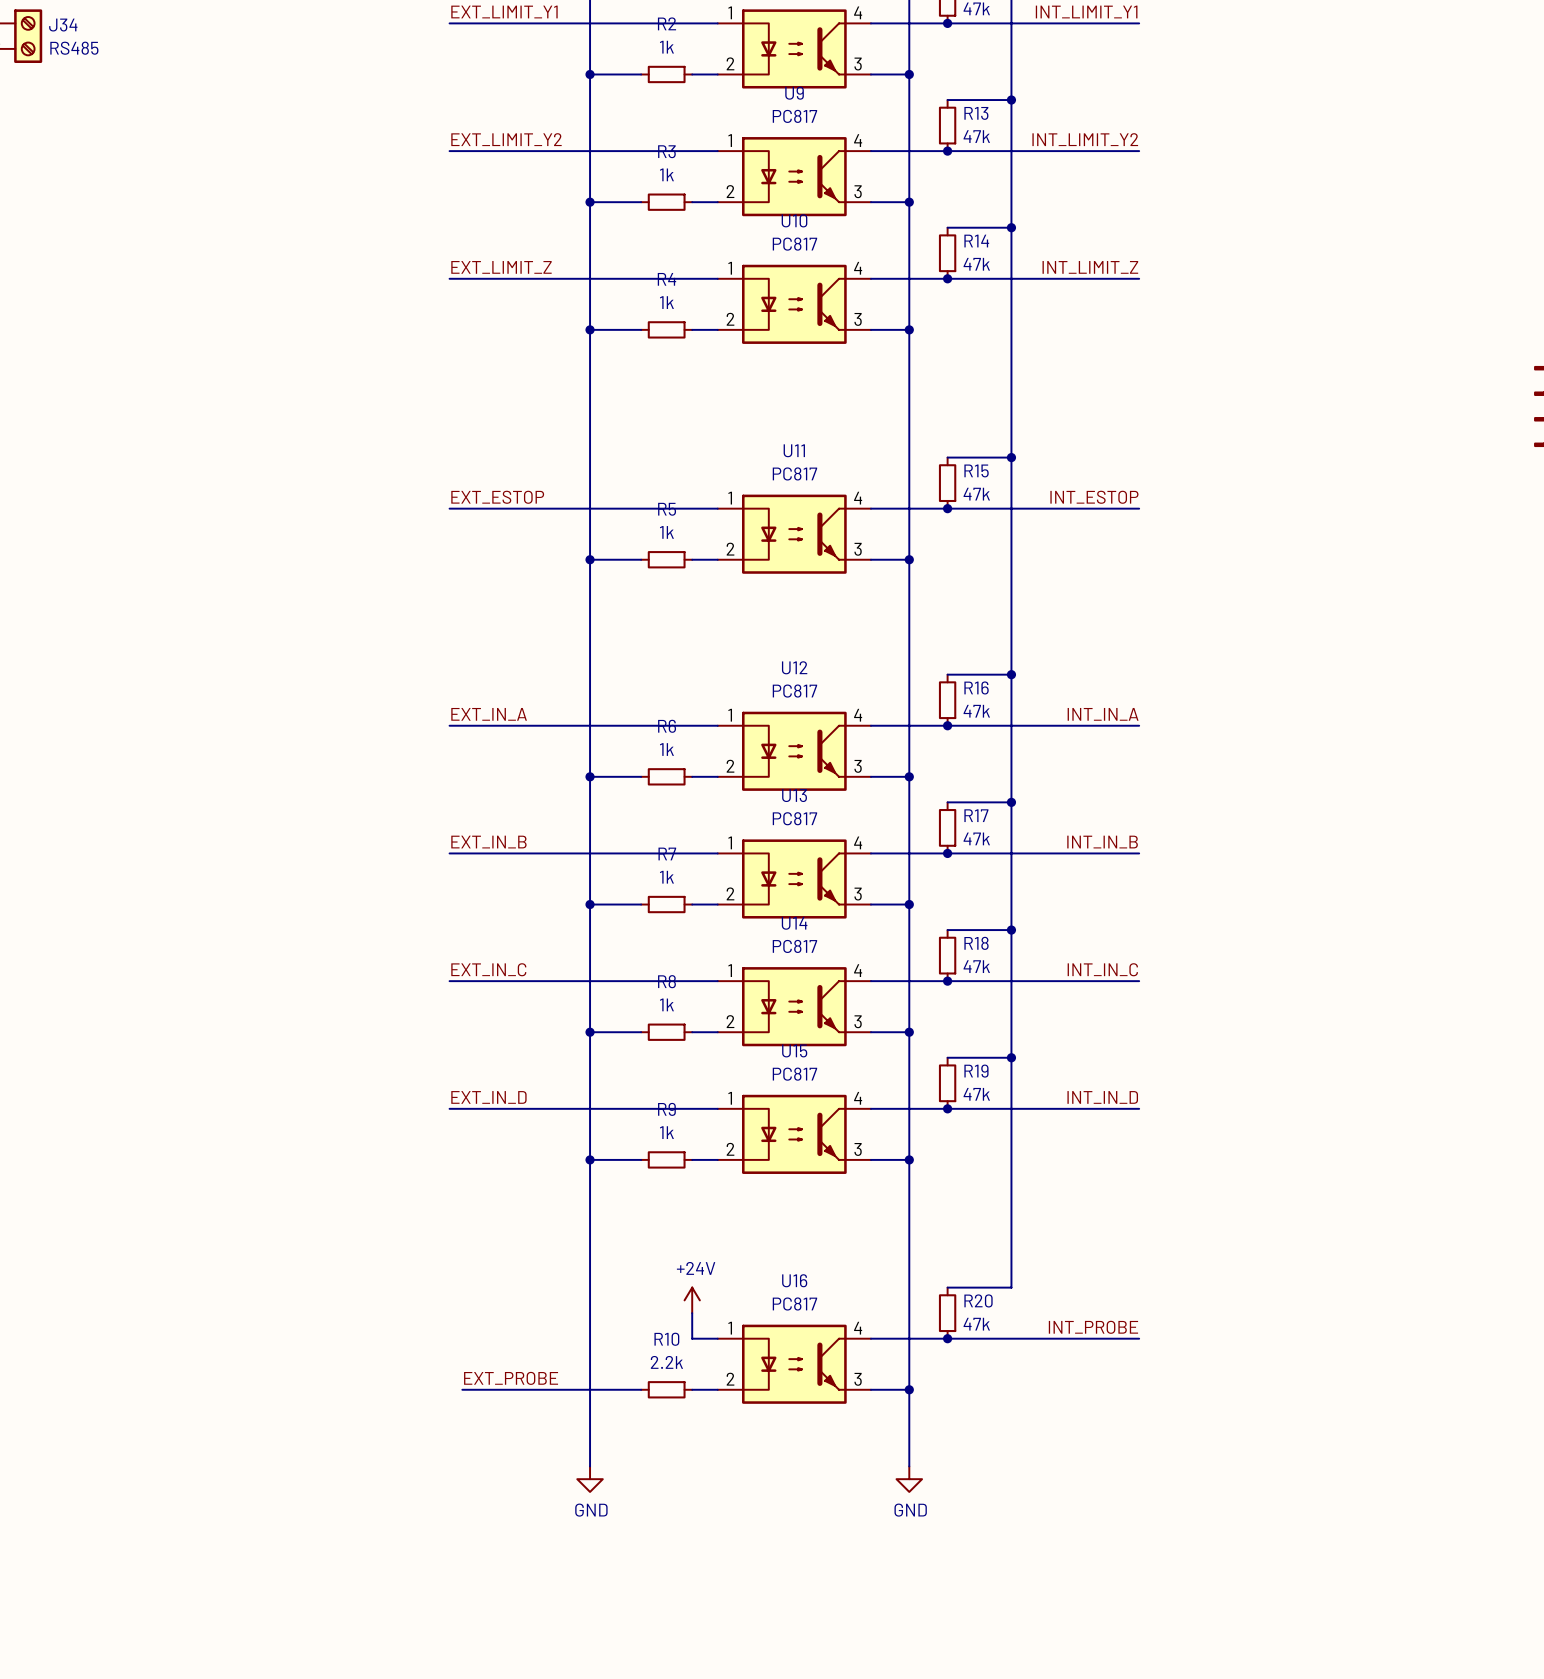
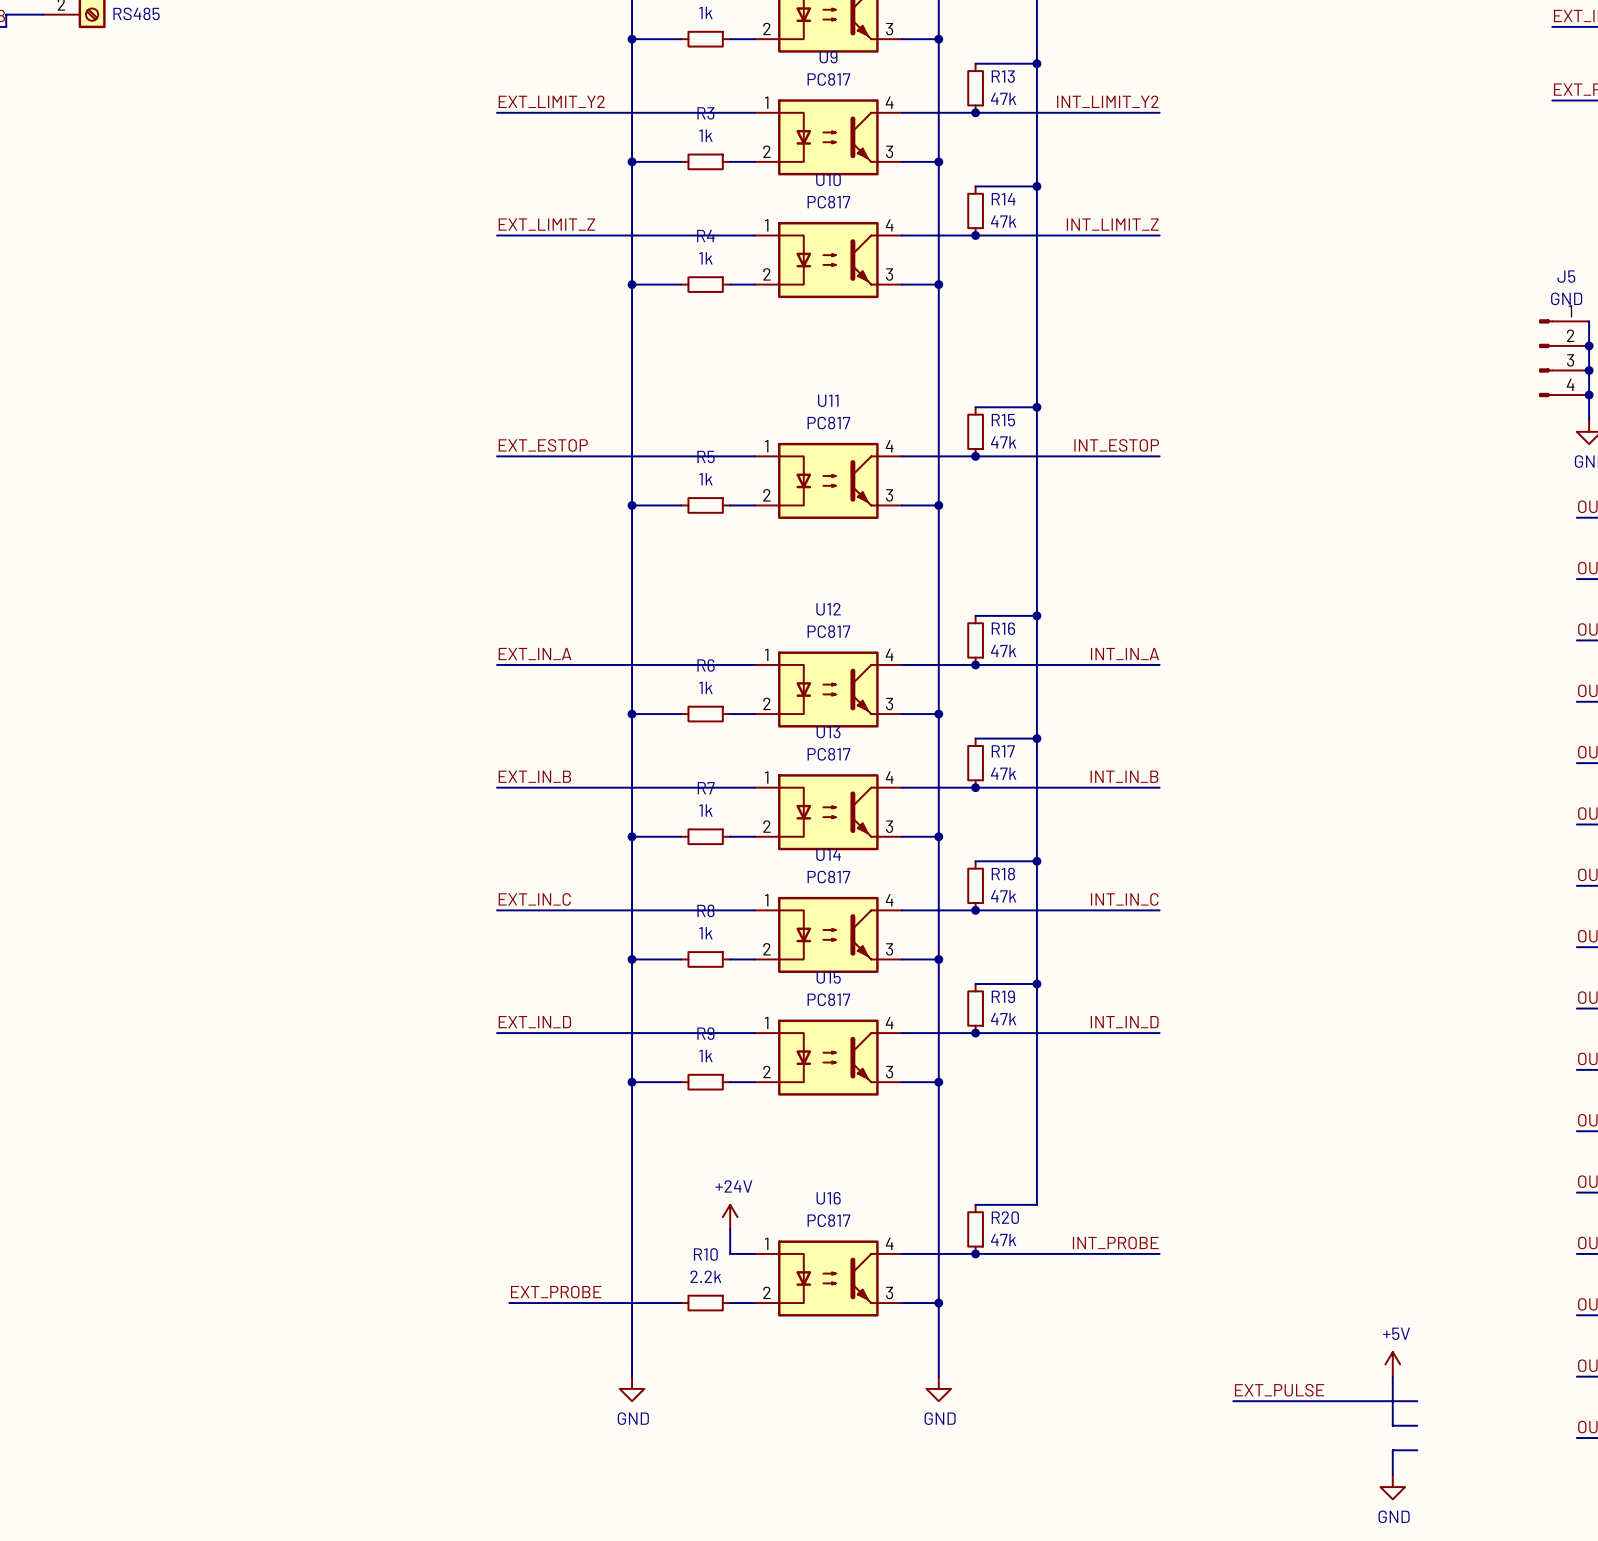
power symbol: none -> +5V (1392, 1364)
wire: none -> (1392, 1376) (1392, 1425) (1417, 1425)
label: none -> EXT_PULSE (1279, 1390)
wire: none -> (1233, 1401) (1417, 1401)
wire: none -> (1417, 1450) (1392, 1450) (1392, 1474)
power symbol: none -> GND (1392, 1487)

